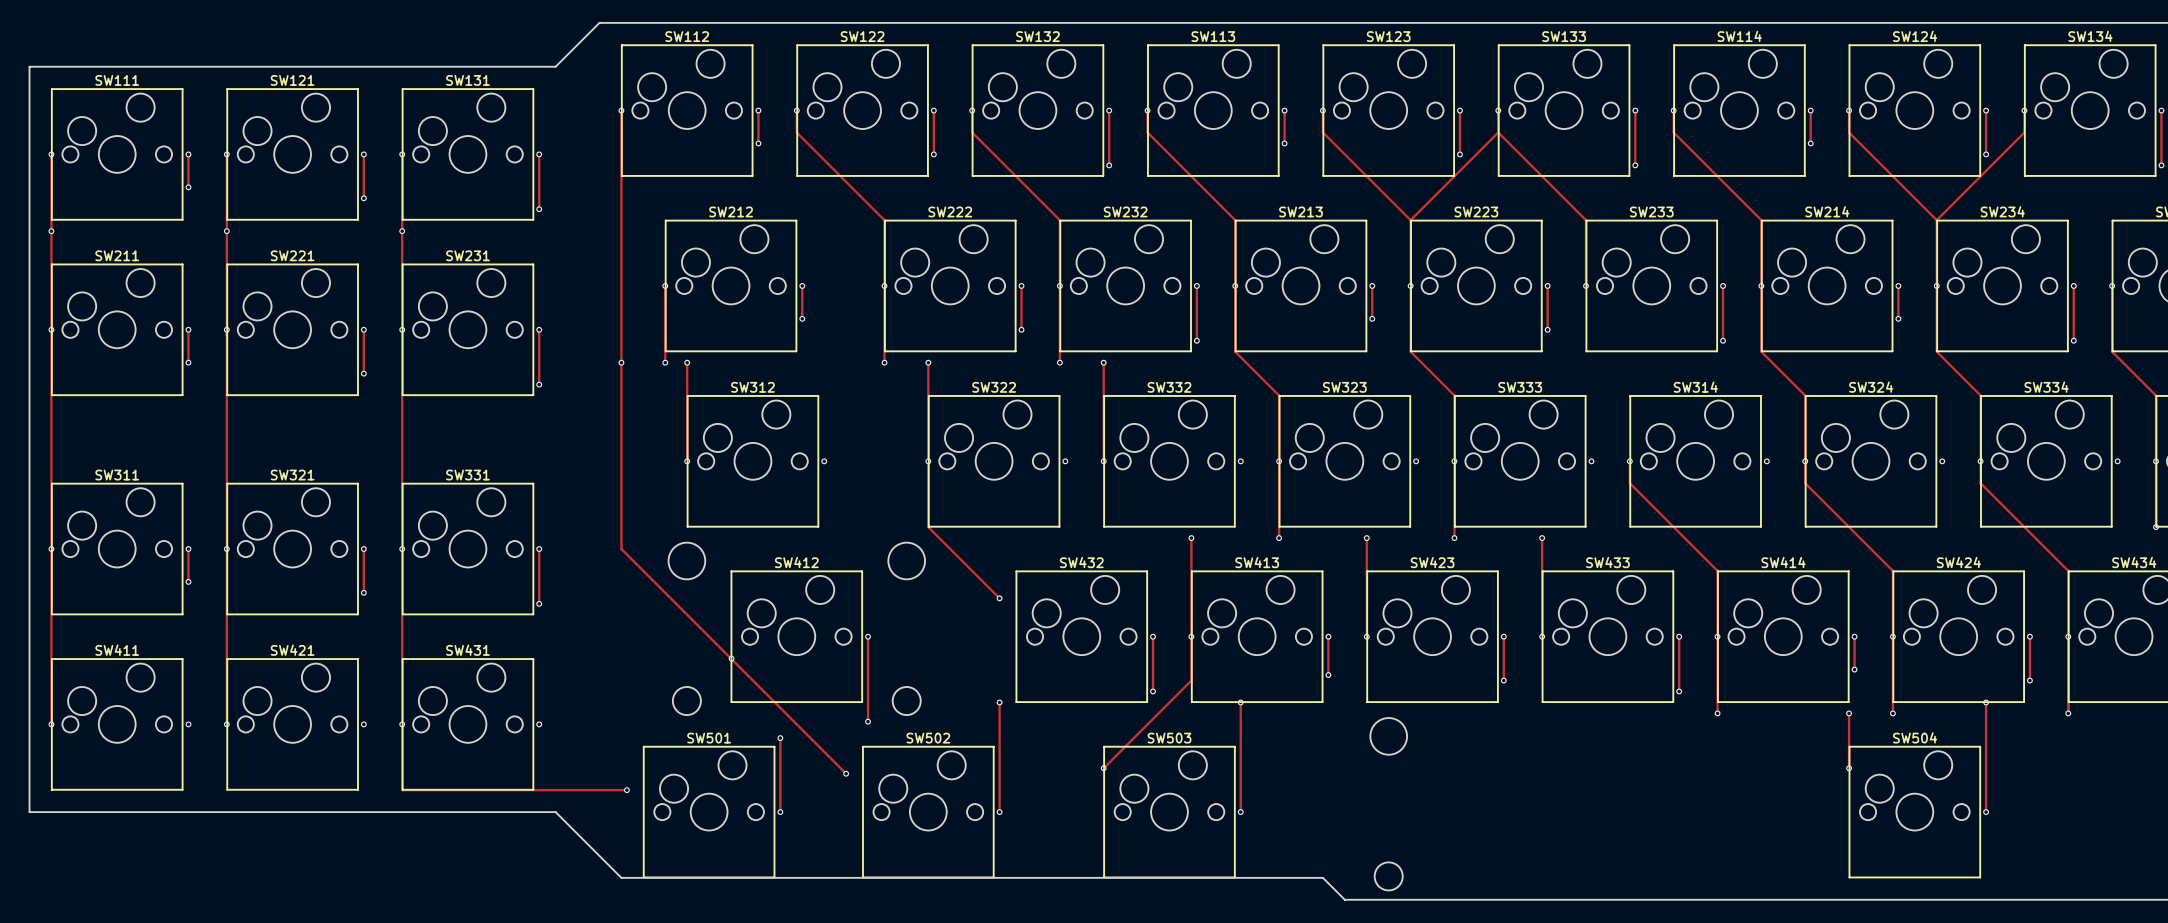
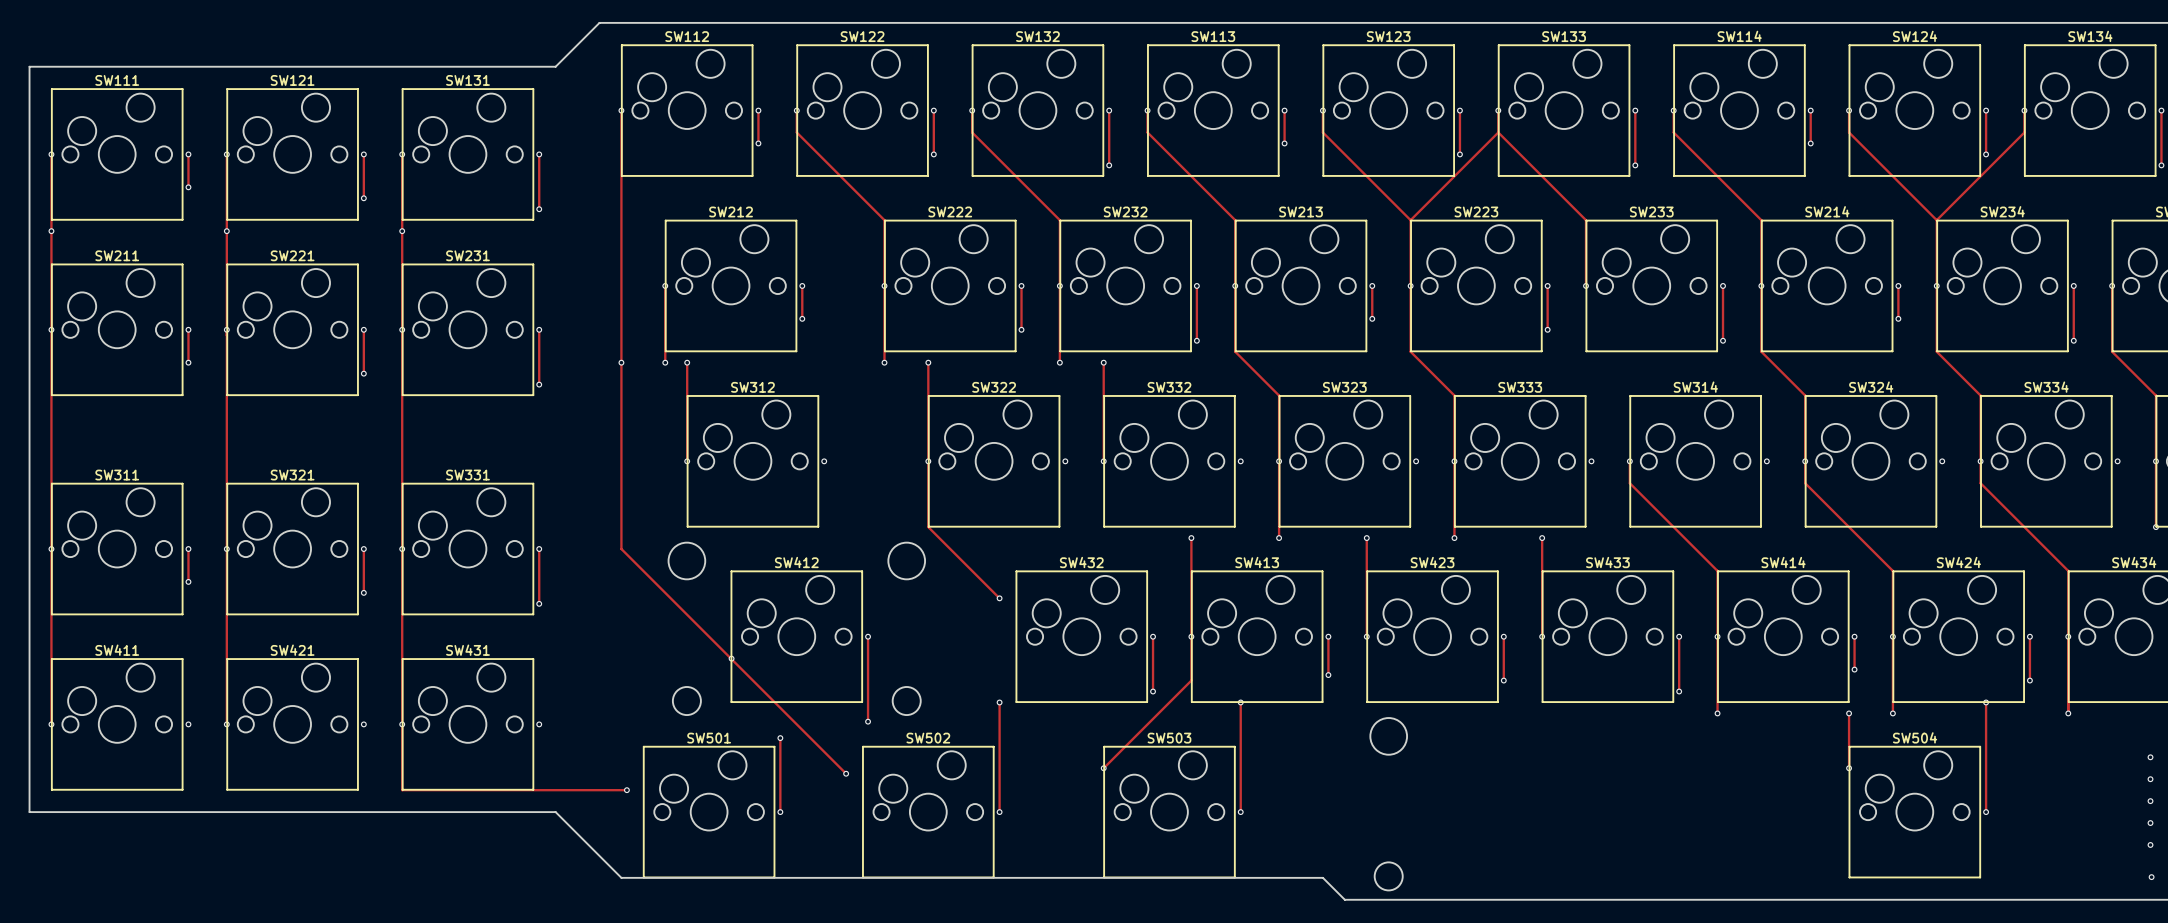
via: none -> (2150, 757)
via: none -> (2150, 779)
via: none -> (2150, 801)
via: none -> (2150, 823)
via: none -> (2150, 844)
via: none -> (2151, 877)

